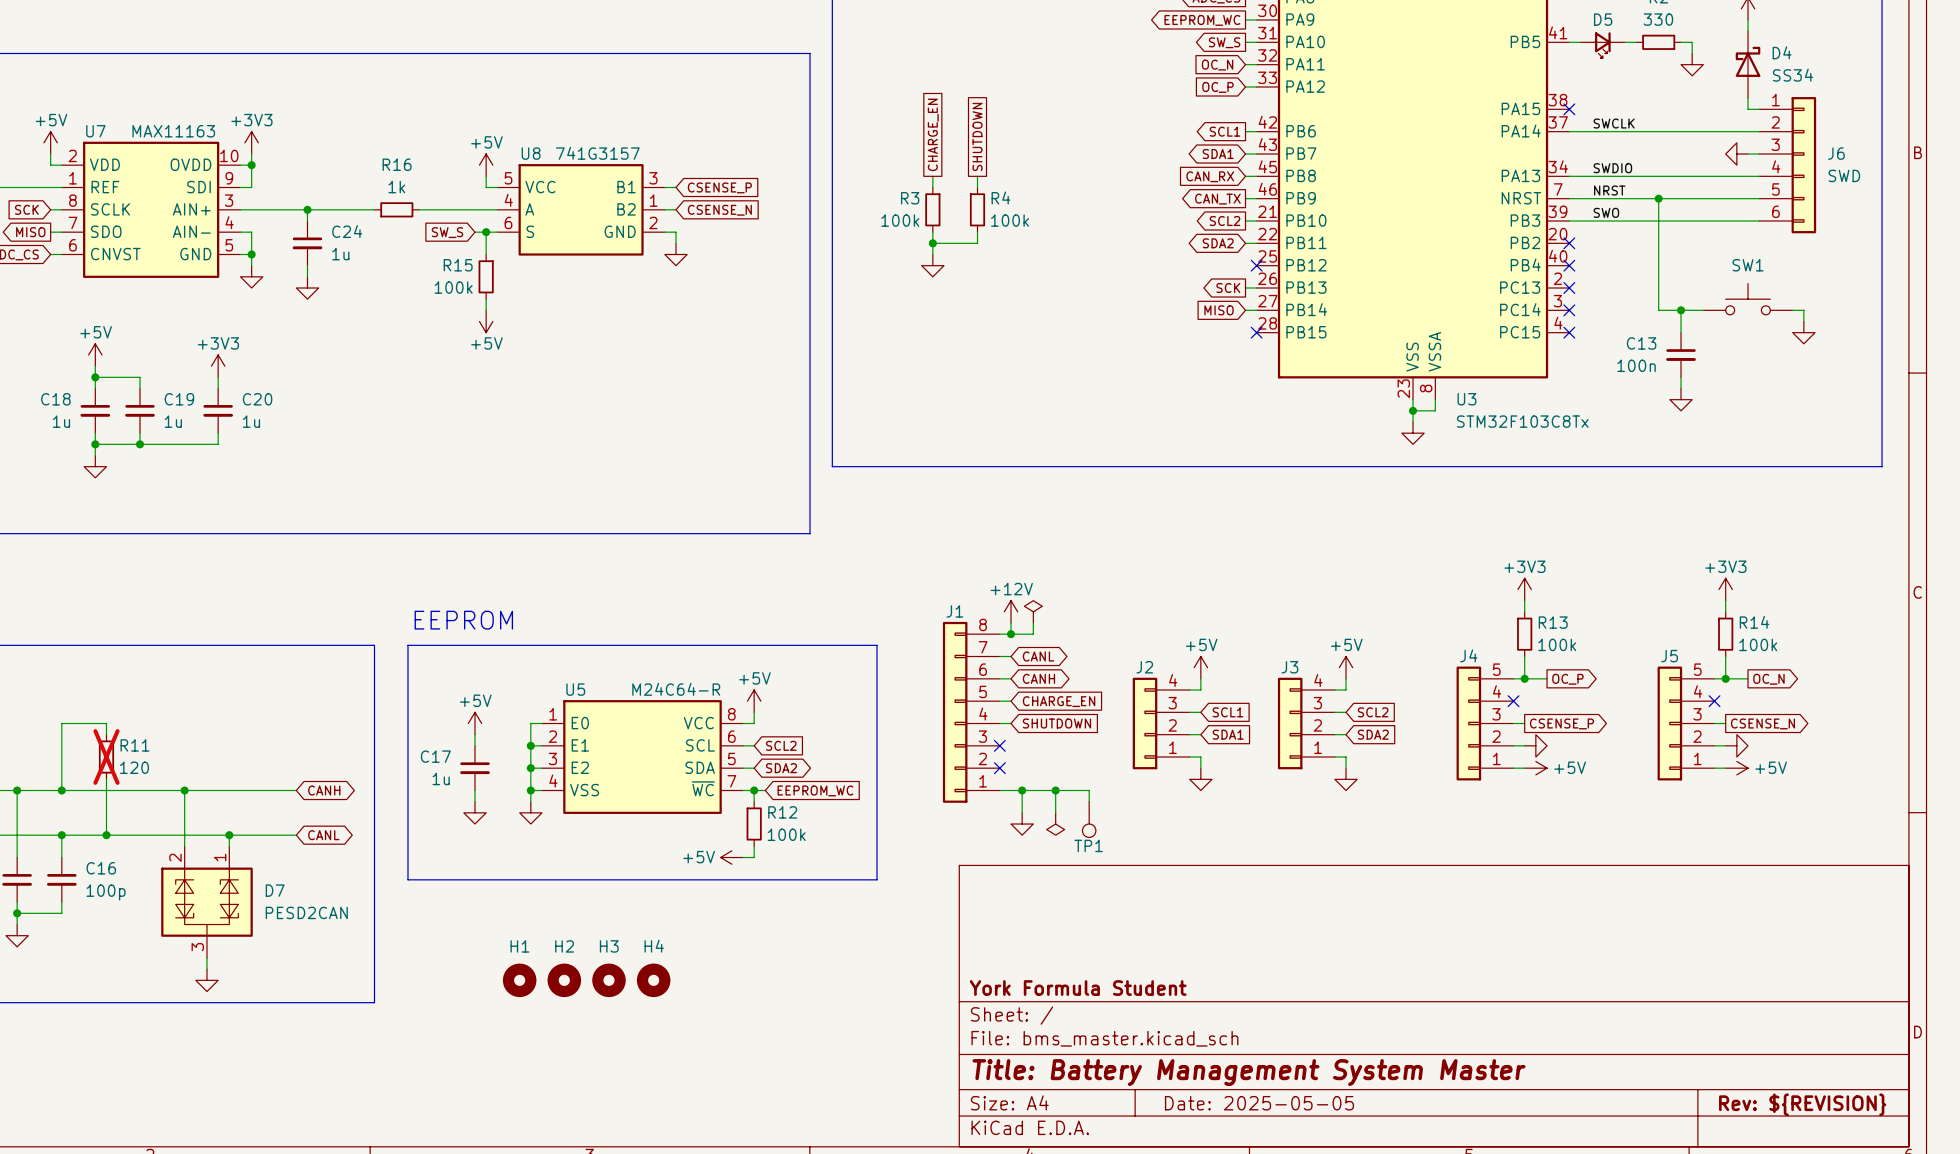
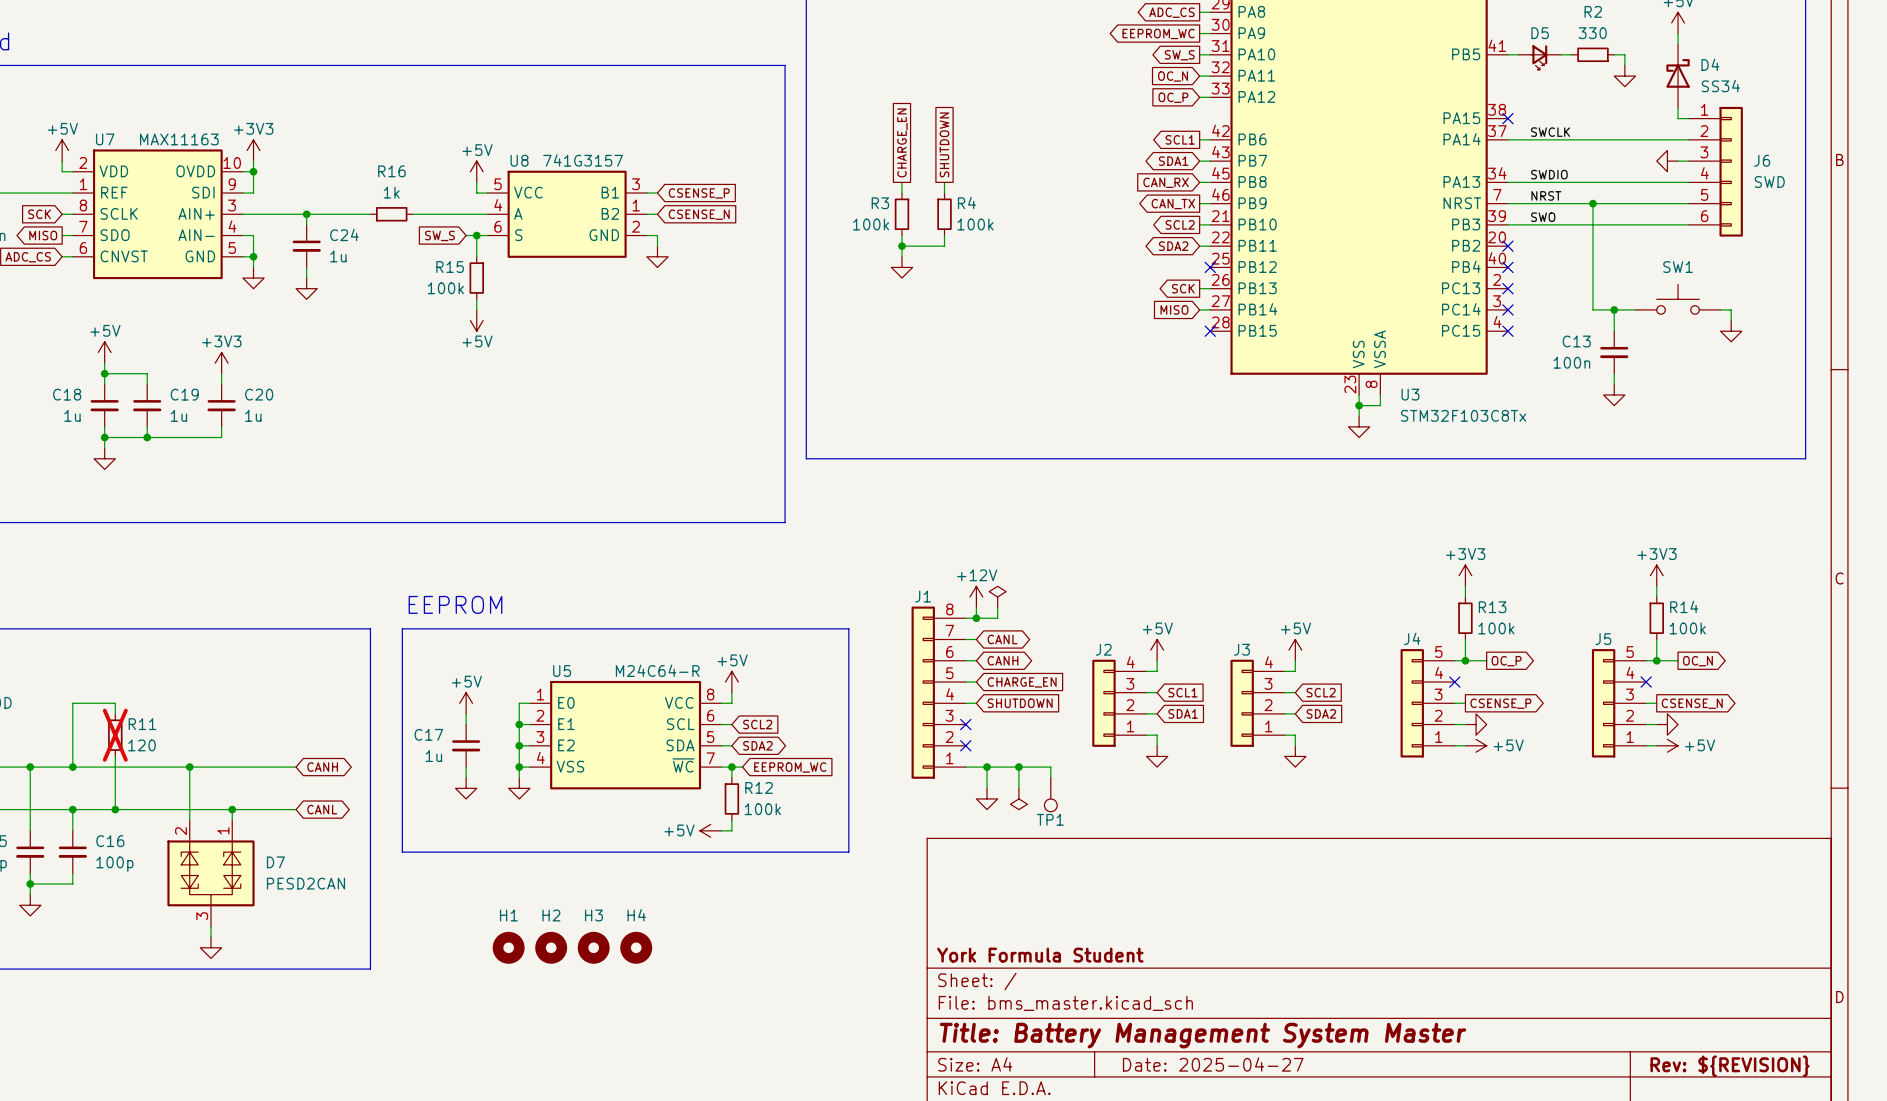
title block: Date: 2025-05-05 (1259, 1103) -> Date: 2025-04-27 (1213, 1064)

